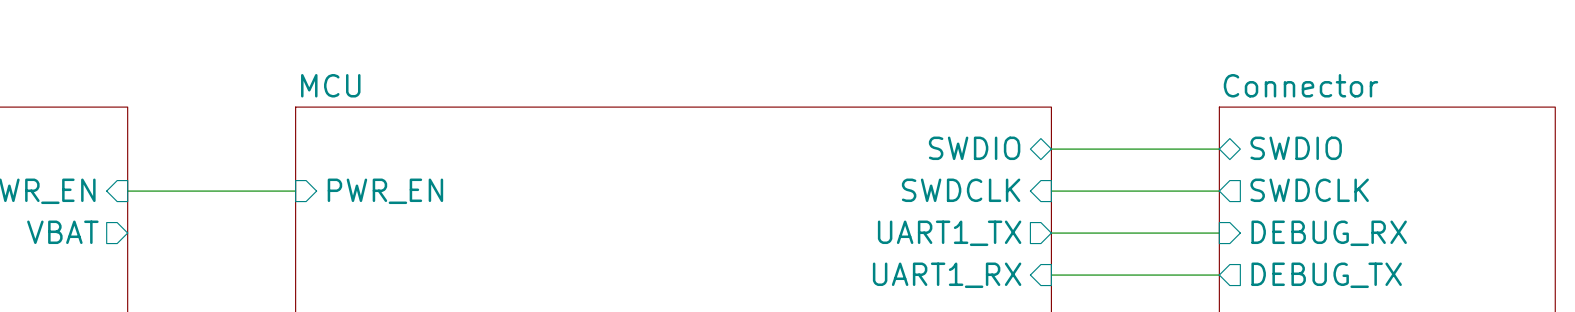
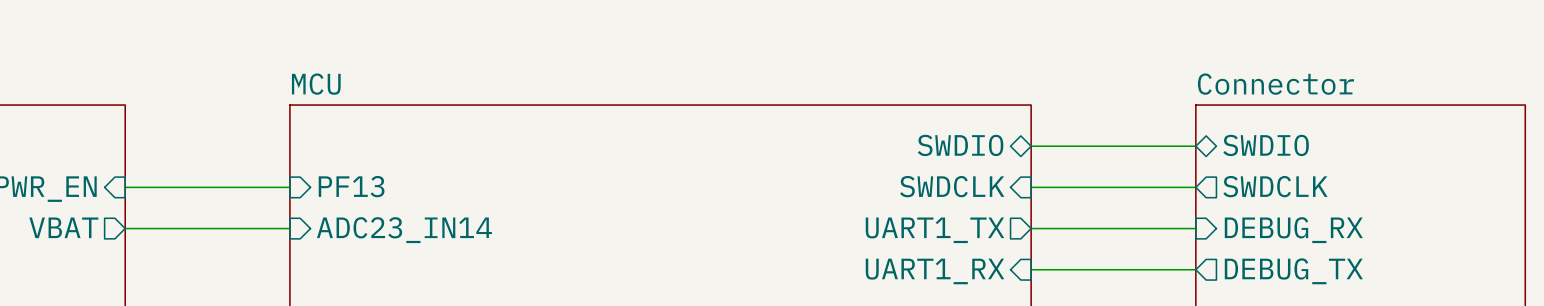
sheet pin: PWR_EN (385, 191) -> PF13 (351, 186)
sheet pin: none -> ADC23_IN14 (404, 230)
wire: none -> (125, 228) (289, 228)

